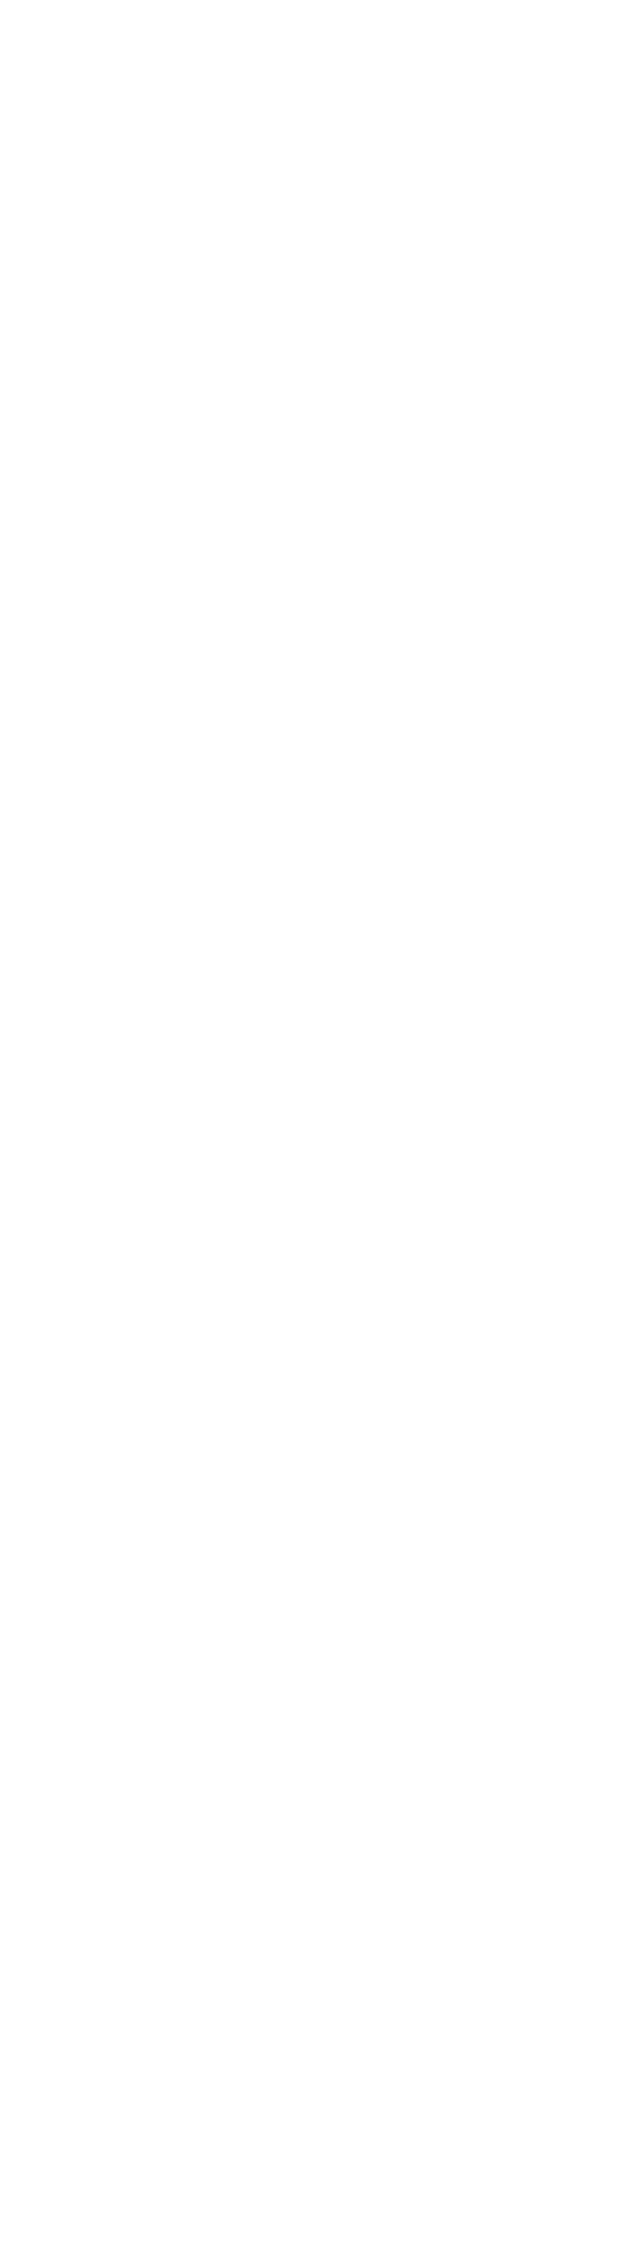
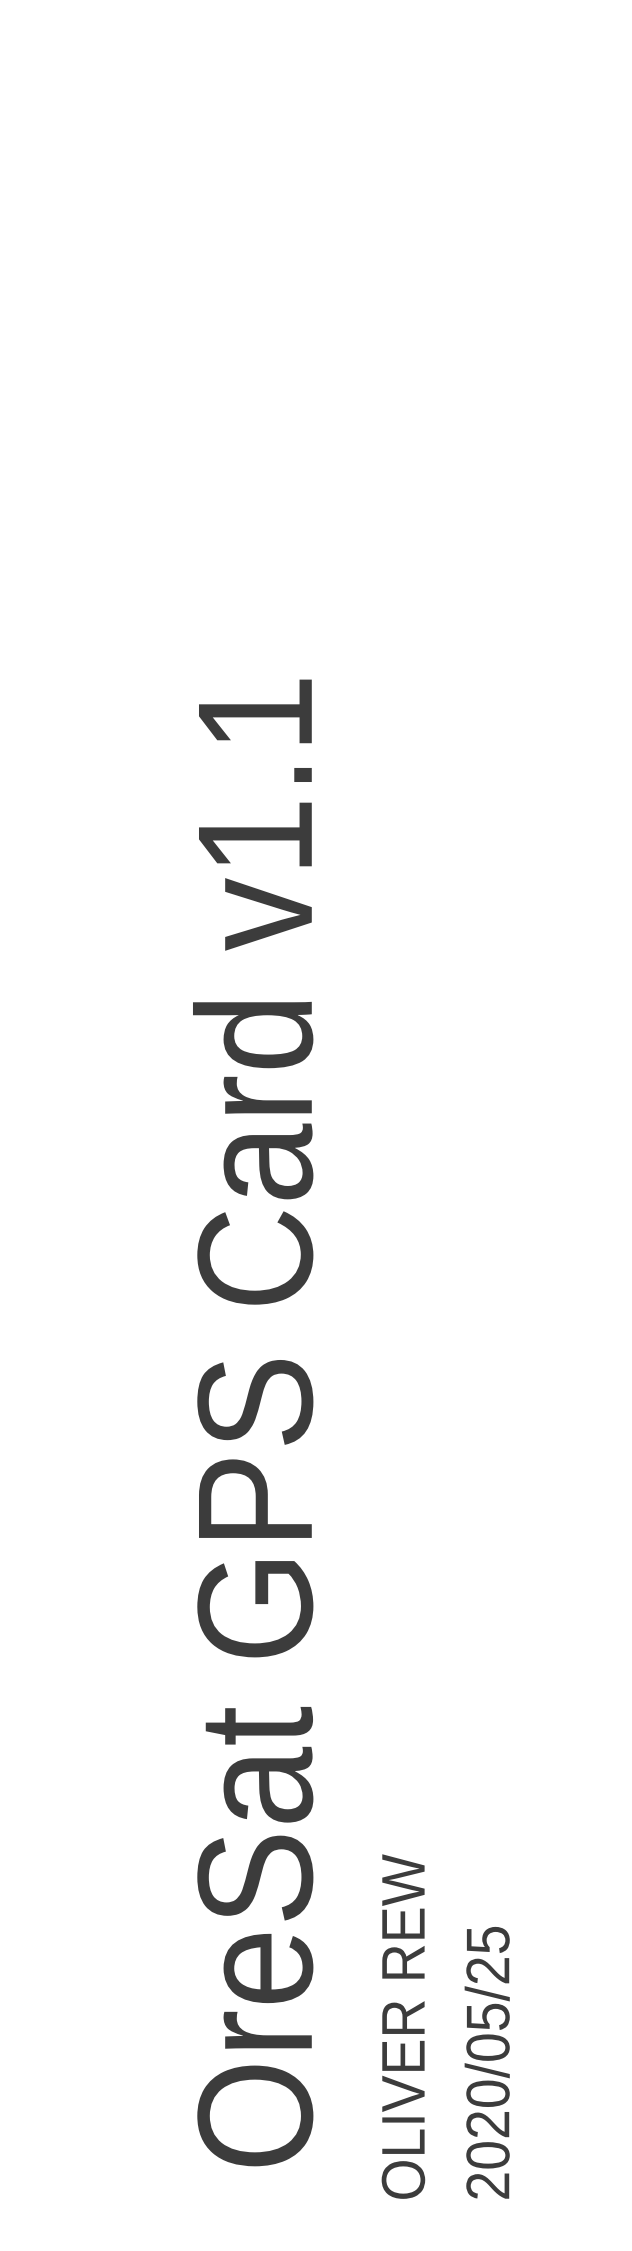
text: none -> OreSat GPS Card v1.1 (253, 1422)
text: none -> OLIVER REW (403, 2026)
text: none -> 2020/05/25 (487, 2062)

